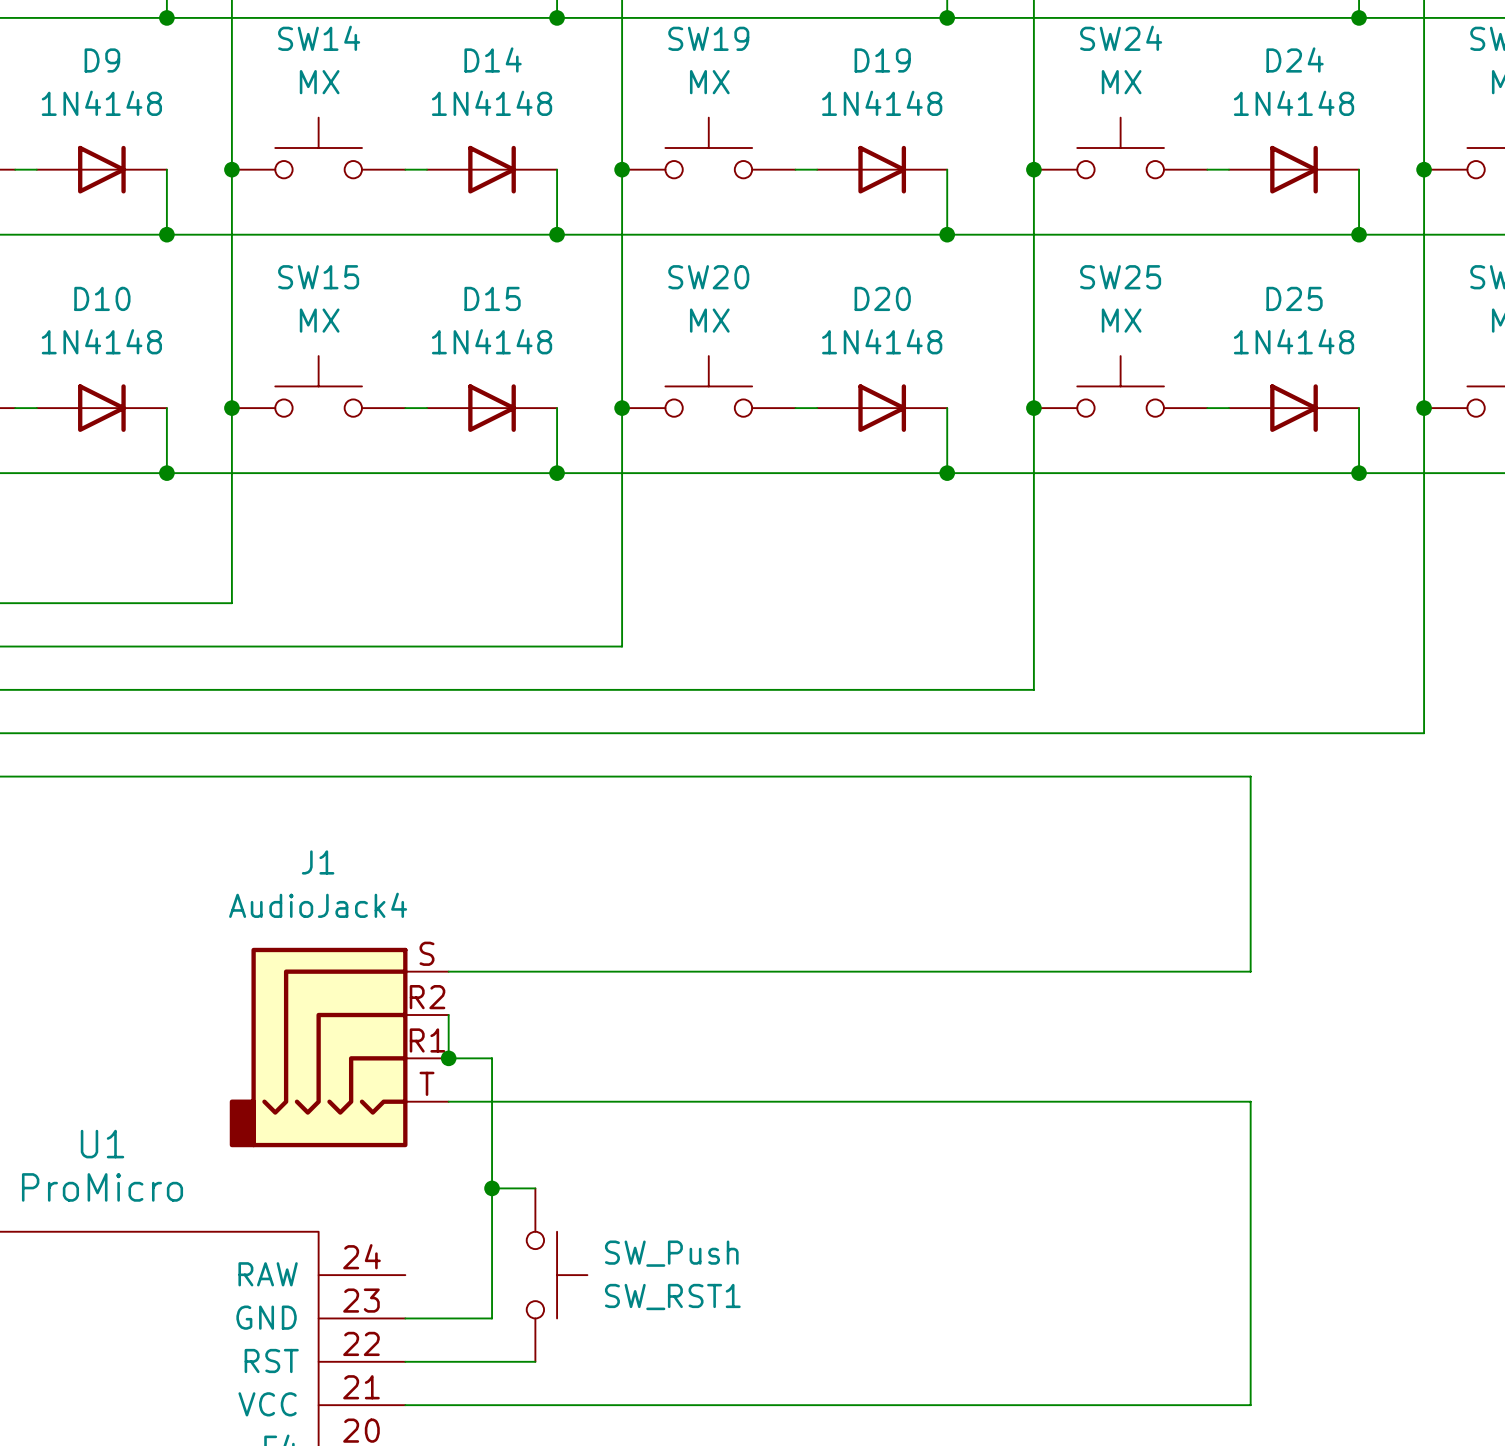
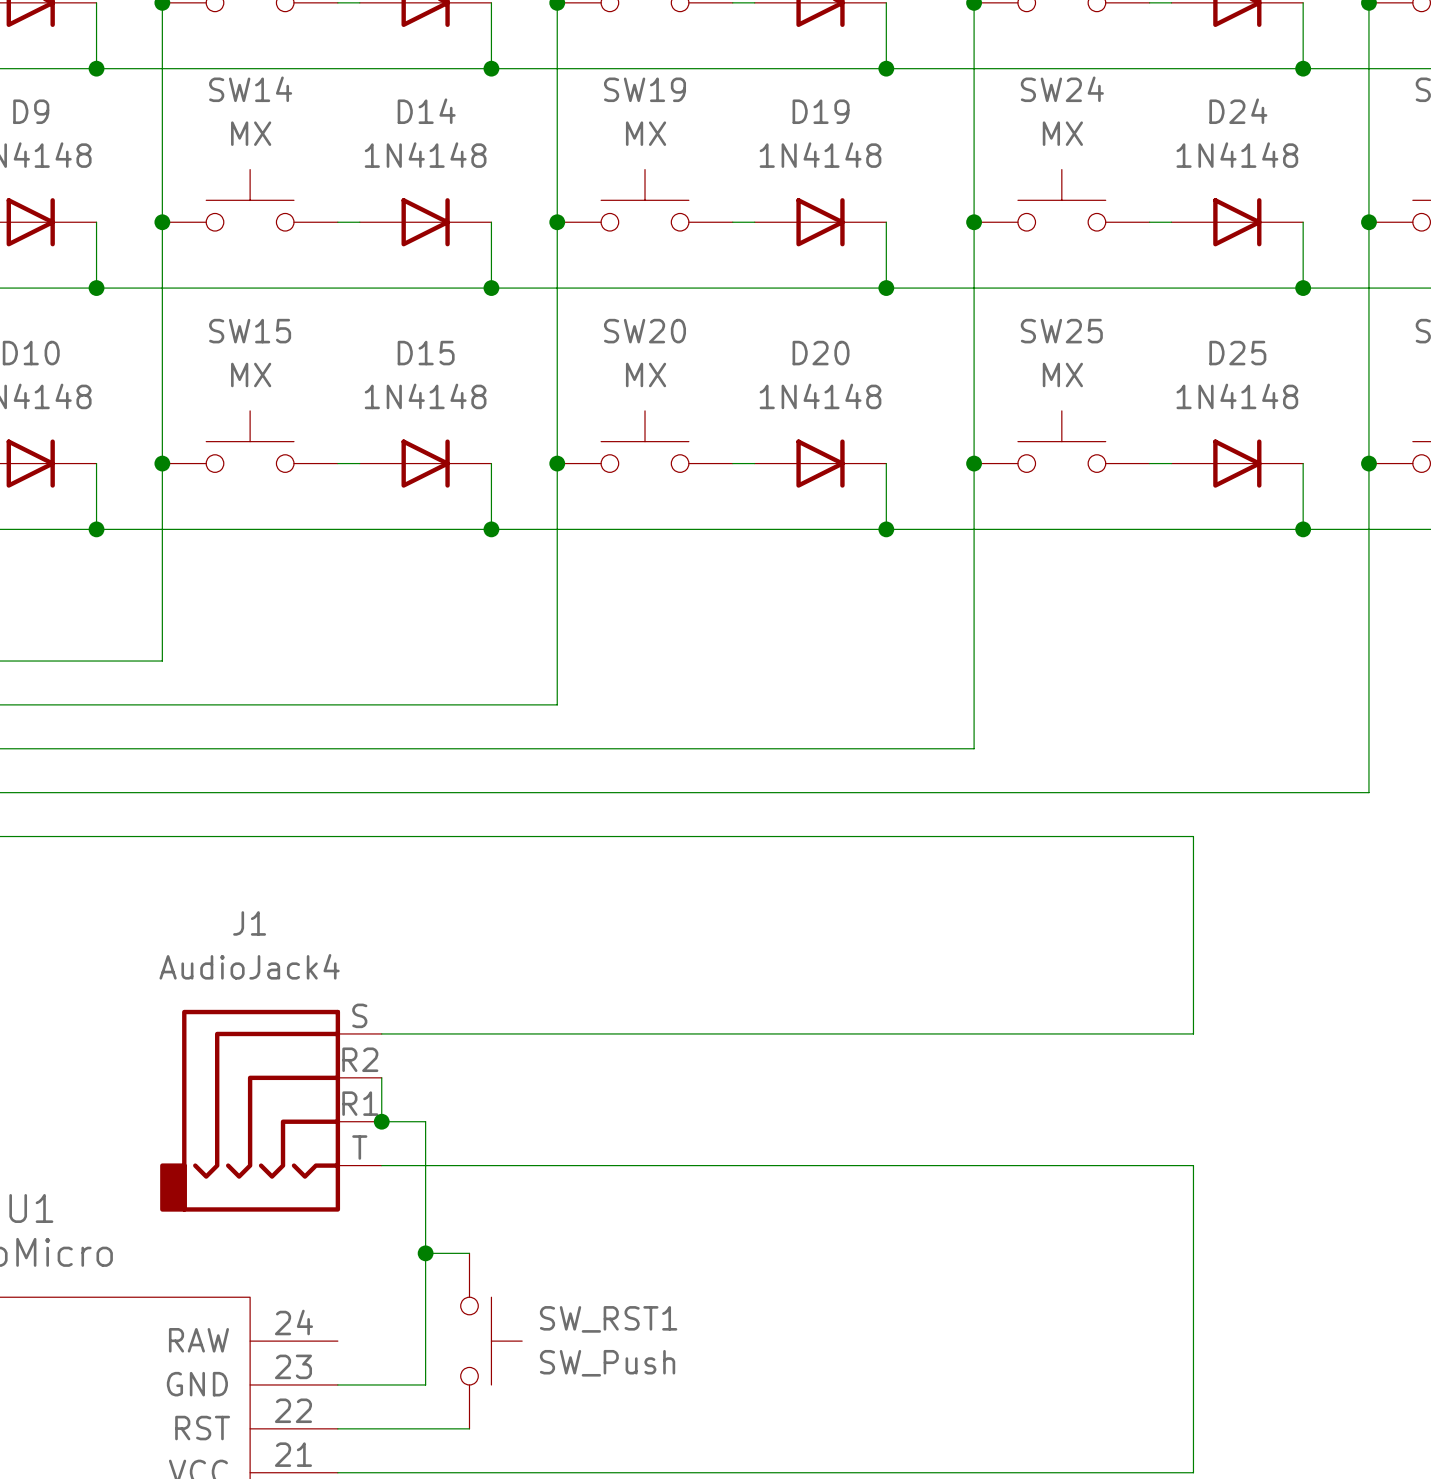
SW_RST1 value position: SW_Push (671, 1253) -> SW_Push (607, 1363)
SW_RST1 name position: SW_RST1 (672, 1297) -> SW_RST1 (608, 1319)

